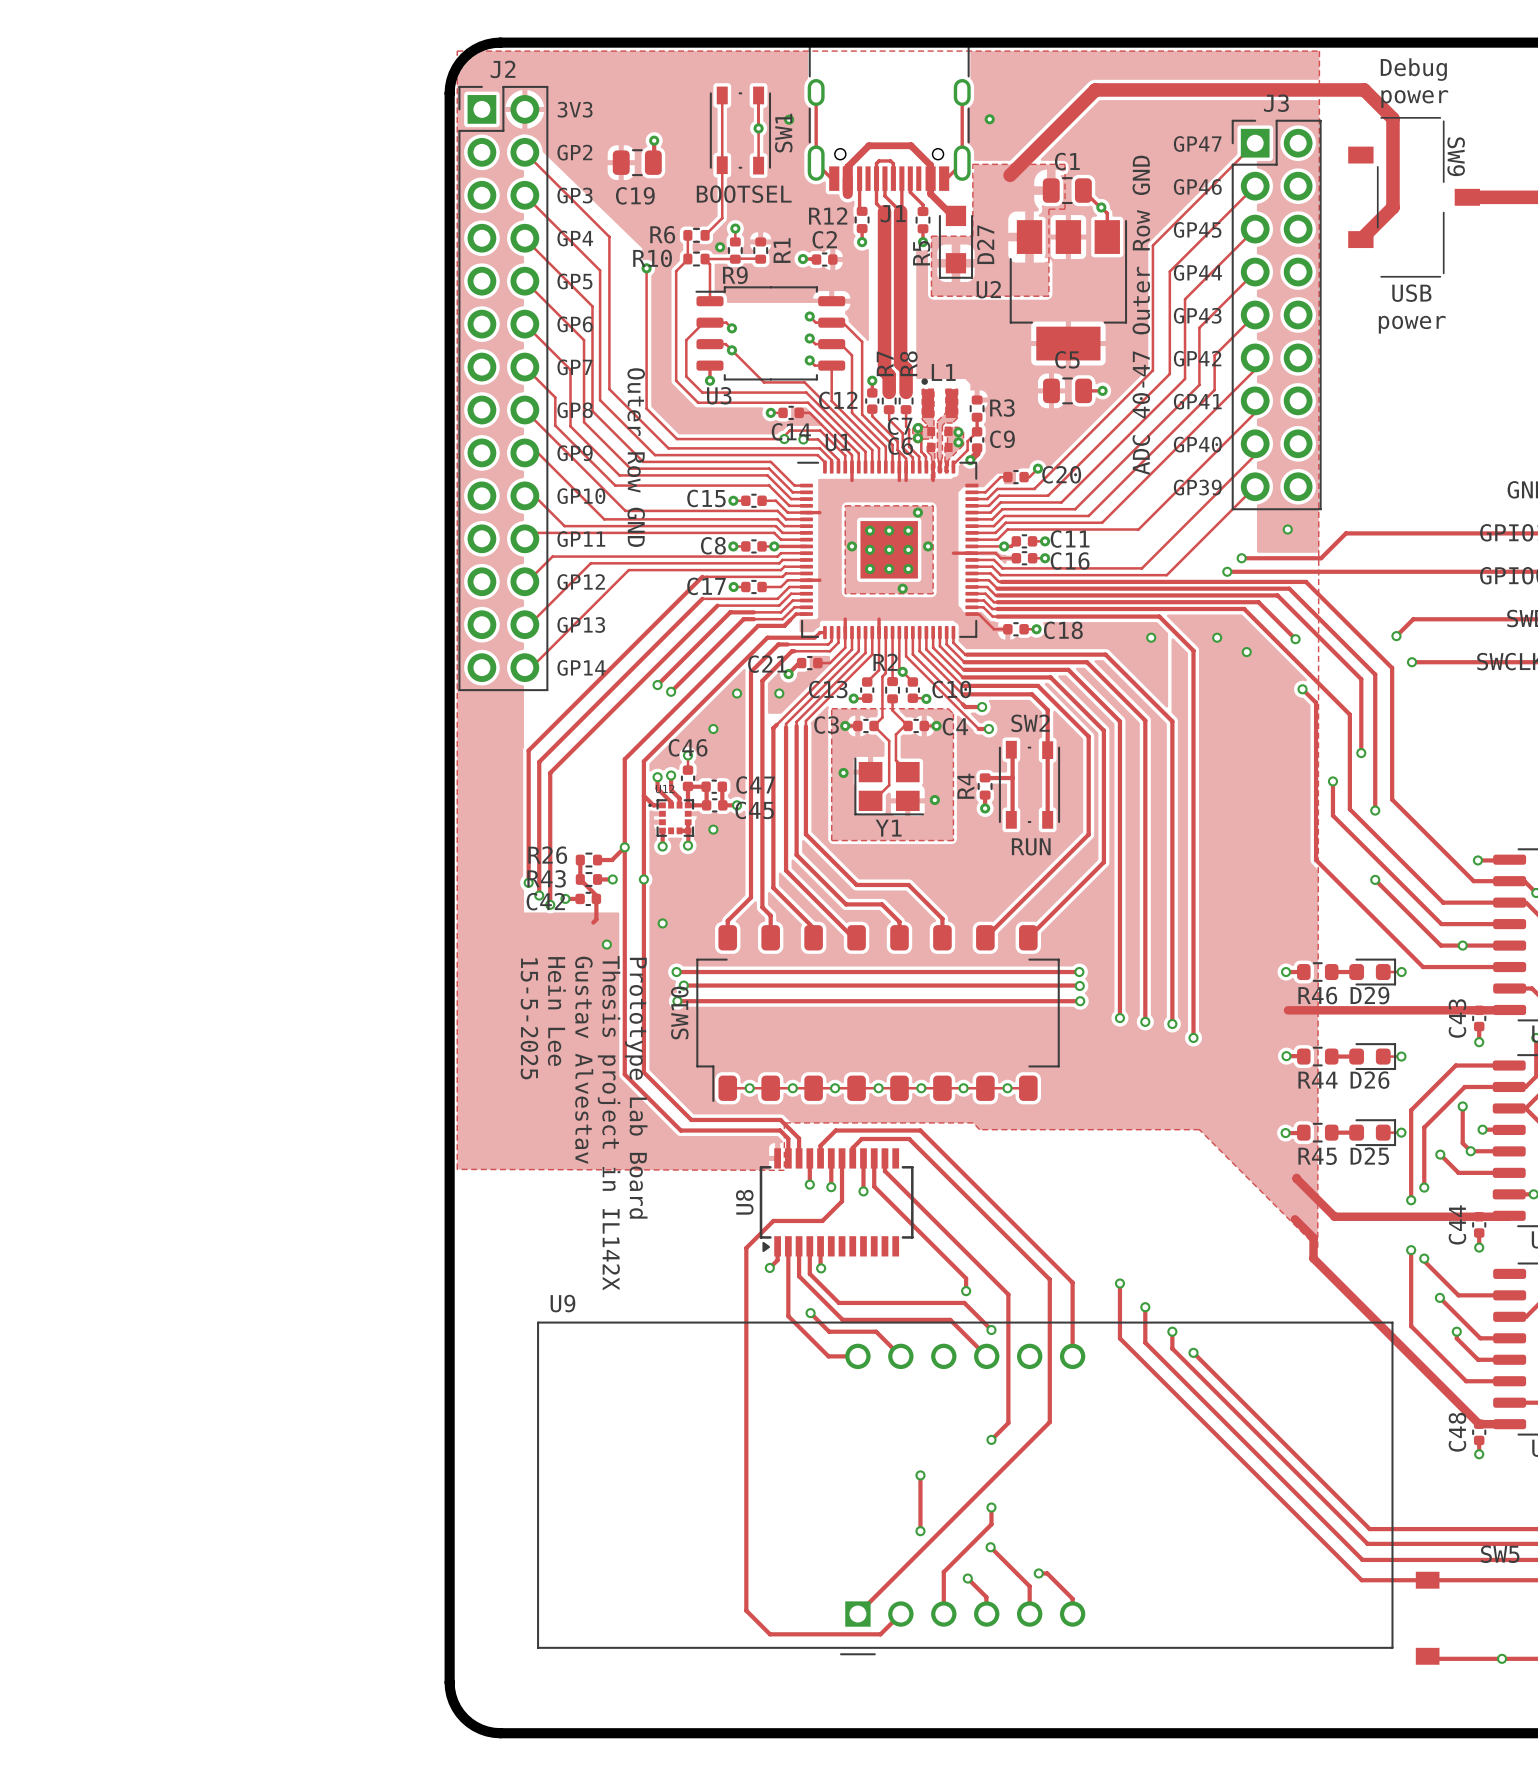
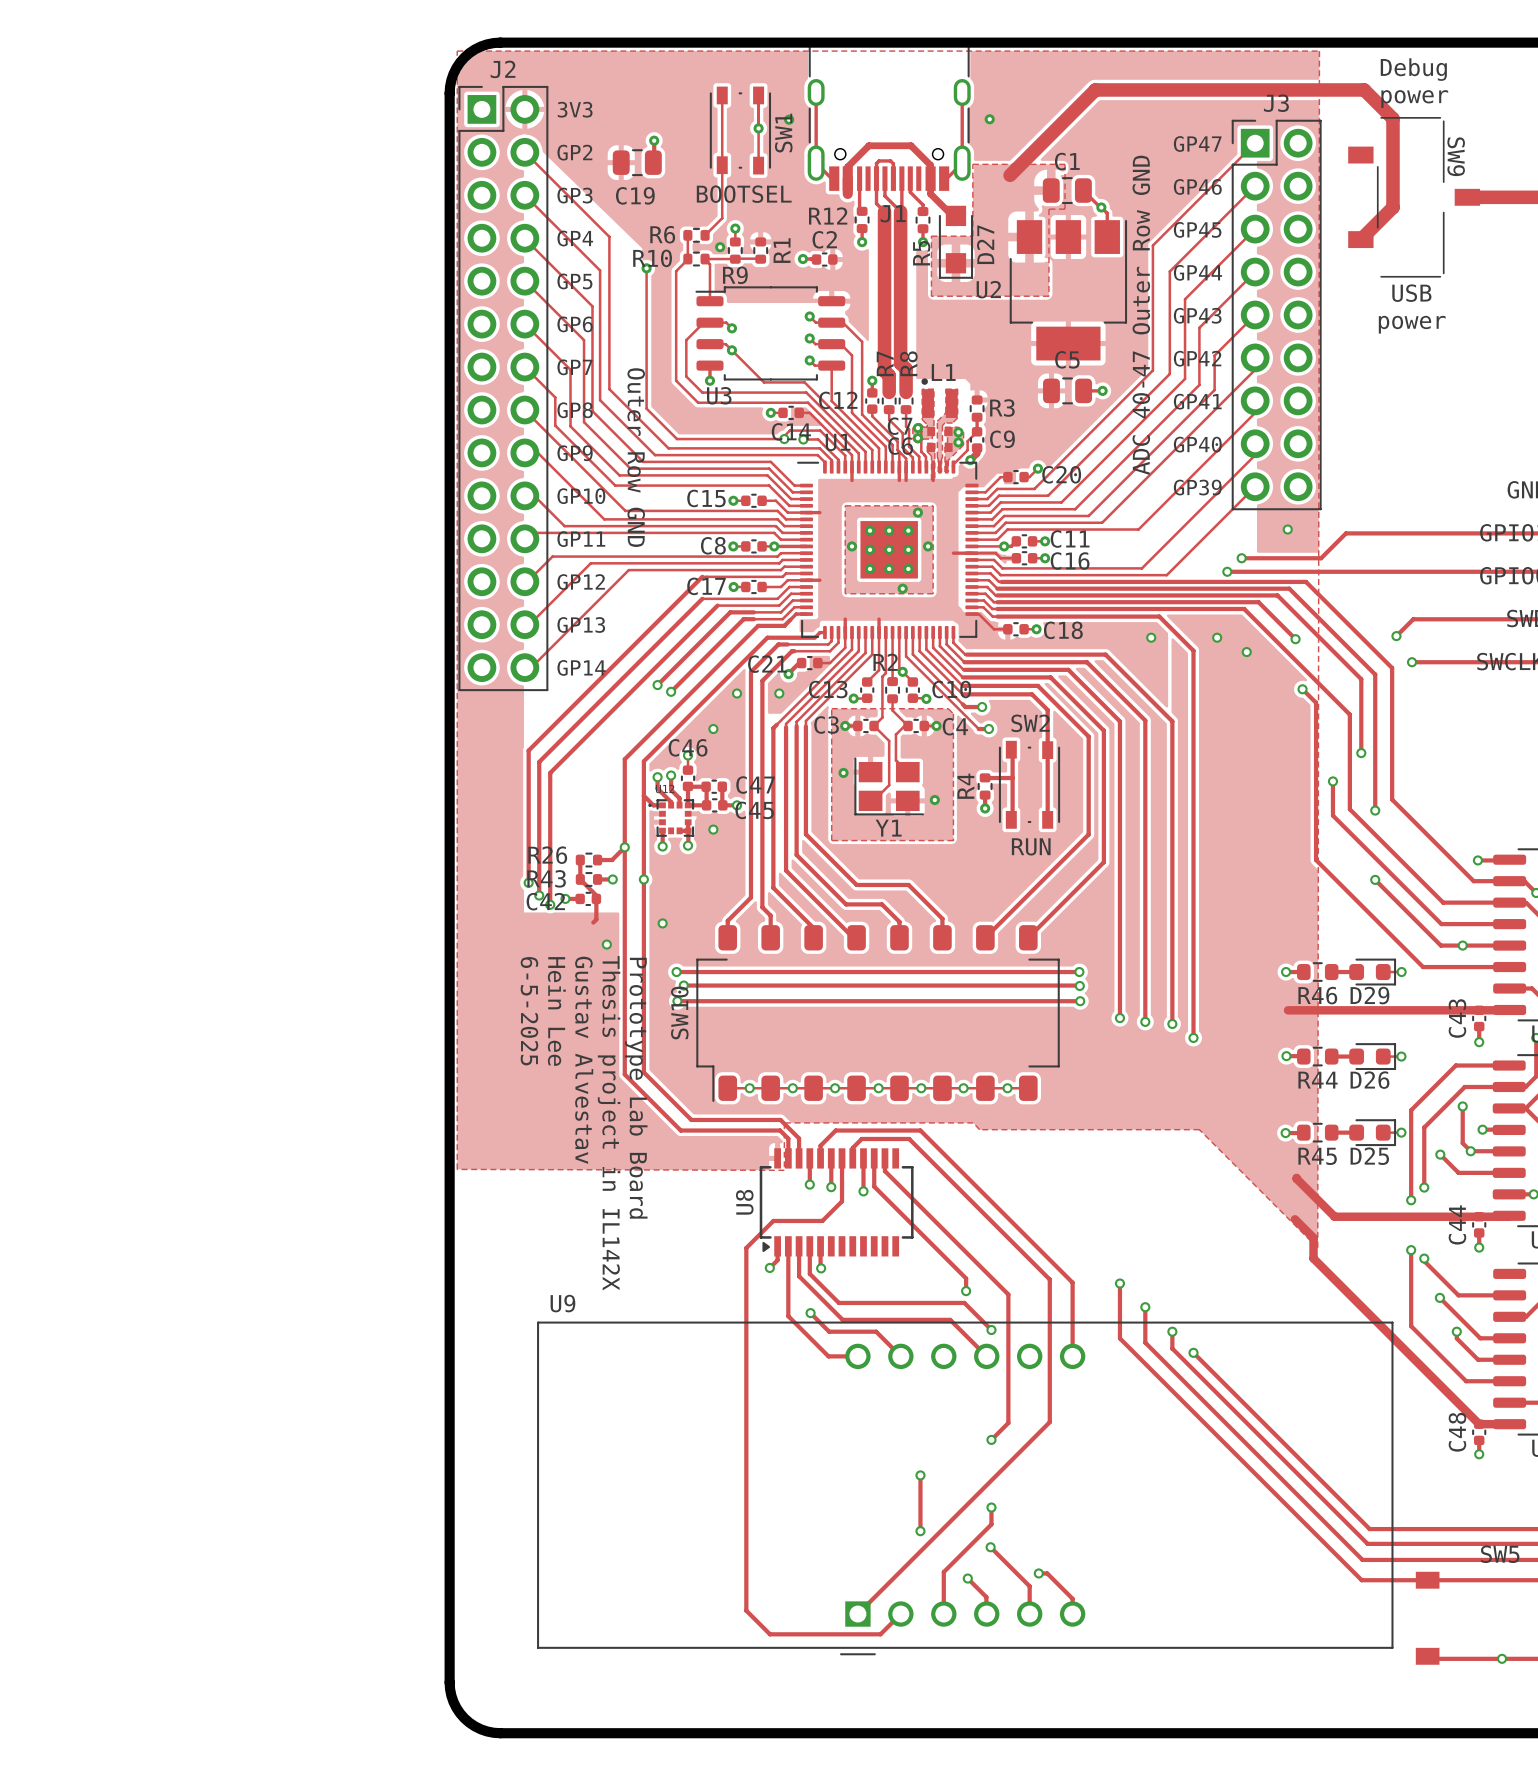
text: 15-5-2025 (529, 1018) -> 6-5-2025 (529, 1011)

